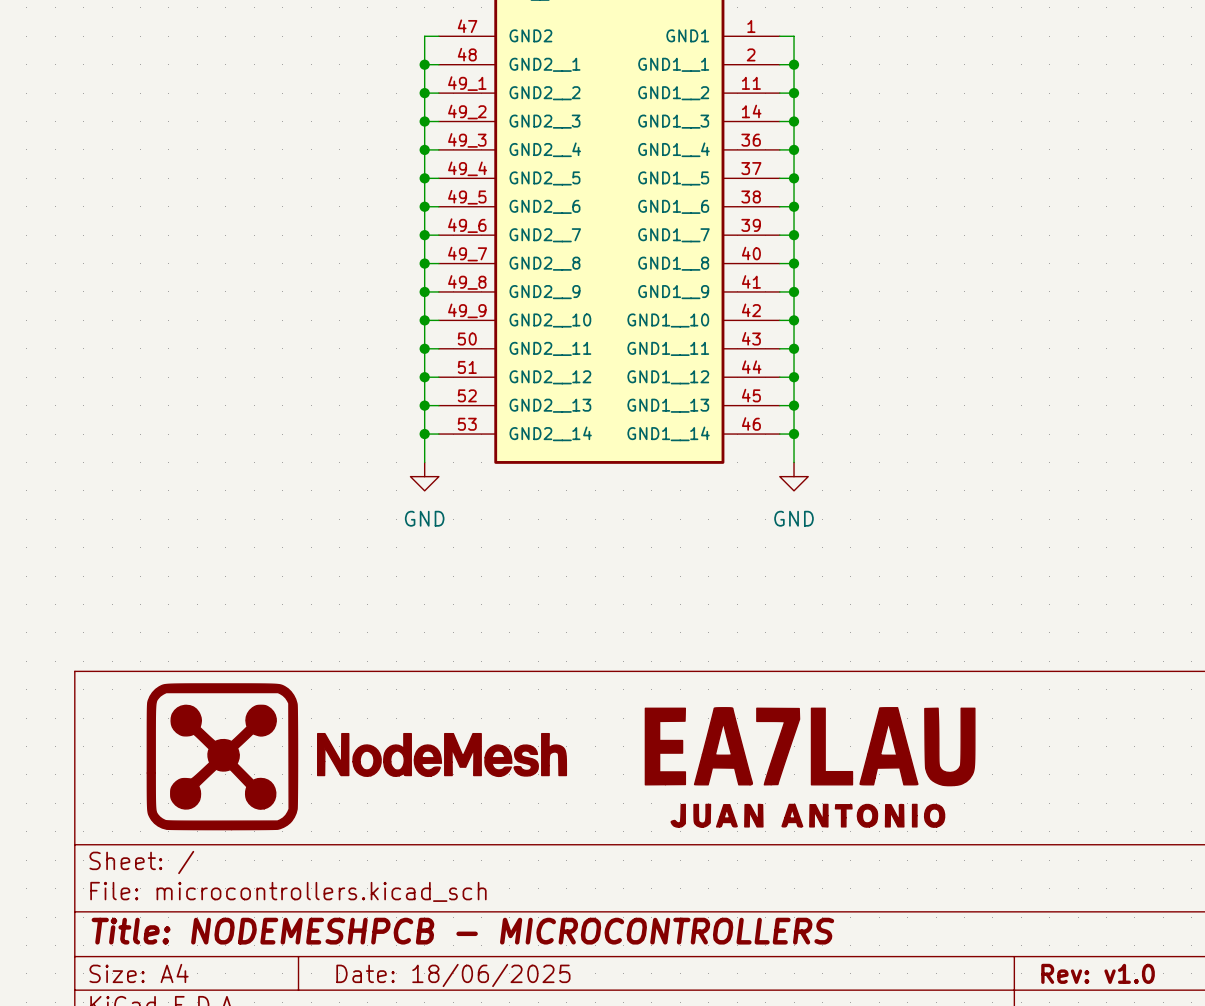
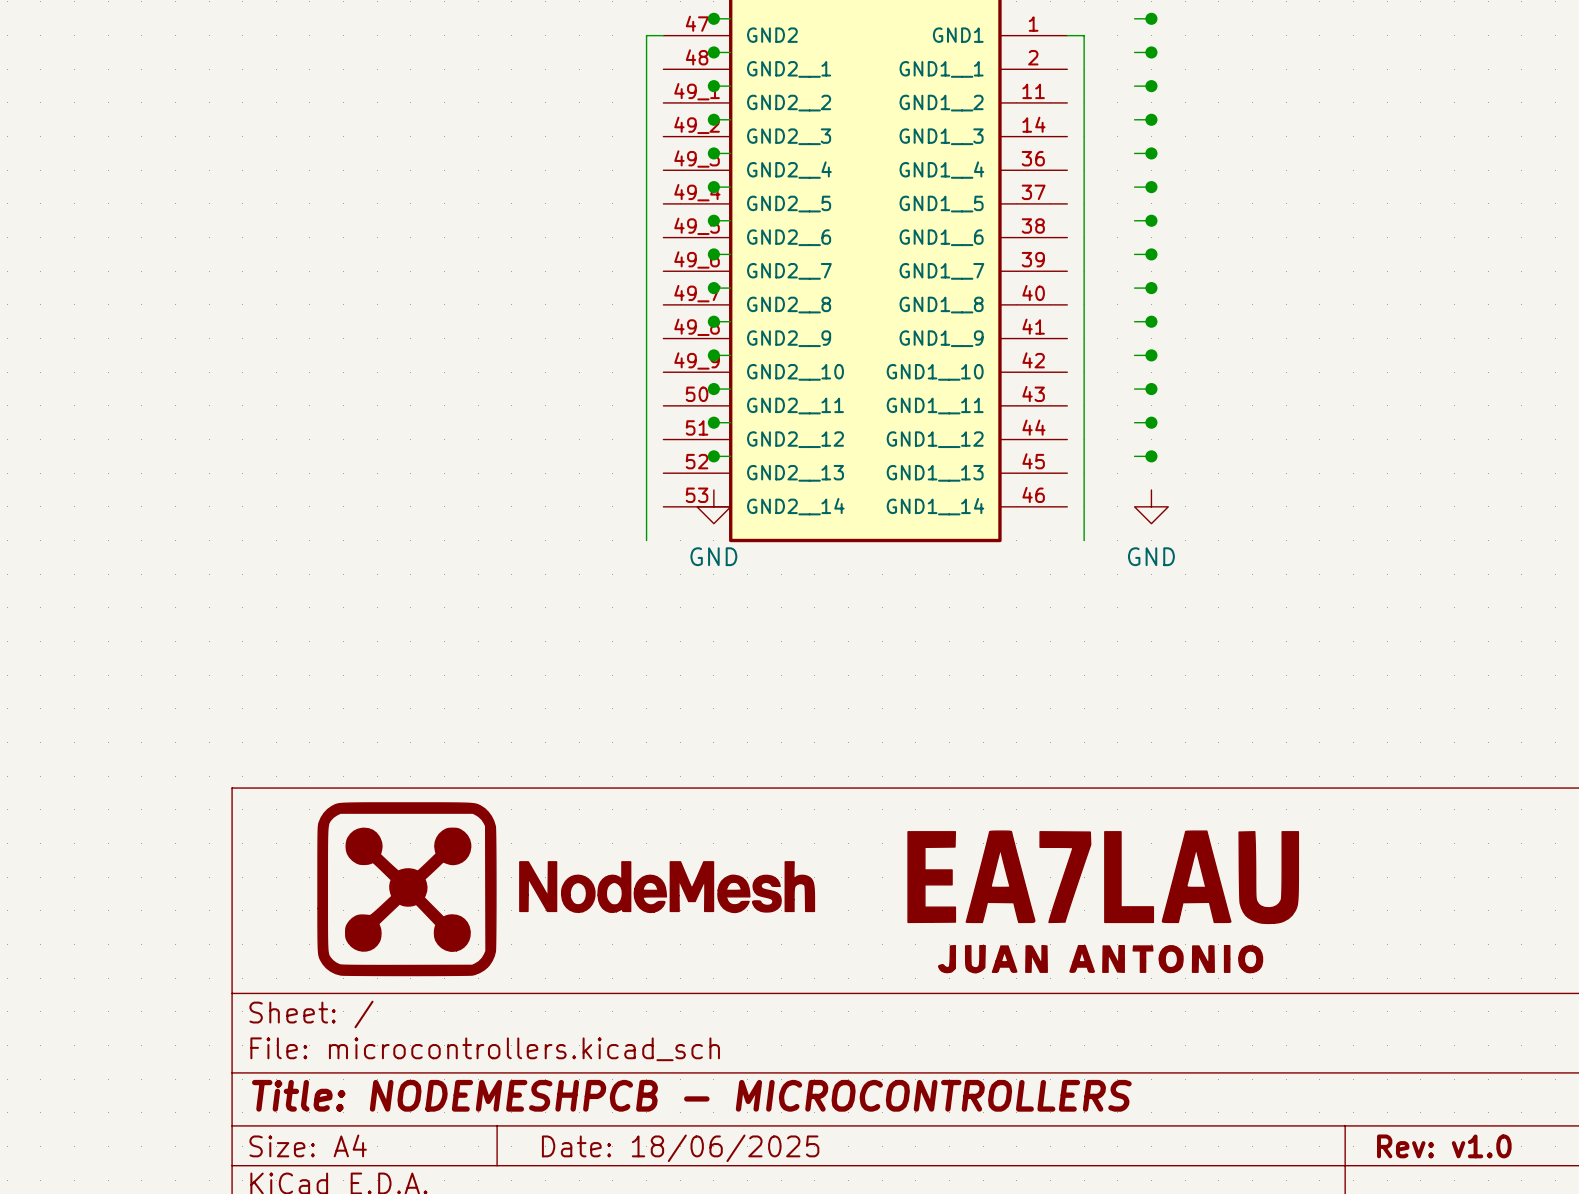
junction: none -> (713, 18)
junction: none -> (1151, 18)
junction: none -> (713, 52)
junction: none -> (1151, 52)
wire: (424, 64) (438, 64) -> (713, 18) (730, 18)
junction: (424, 64) -> none
wire: (779, 64) (794, 64) -> (1134, 18) (1151, 18)
junction: (794, 64) -> none
junction: none -> (713, 86)
junction: none -> (1151, 86)
wire: (424, 93) (438, 93) -> (713, 52) (730, 52)
junction: (424, 93) -> none
wire: (779, 93) (794, 93) -> (1134, 52) (1151, 52)
junction: (794, 93) -> none
junction: none -> (713, 119)
junction: none -> (1151, 119)
wire: (424, 121) (438, 121) -> (713, 86) (730, 86)
junction: (424, 121) -> none
wire: (779, 121) (794, 121) -> (1134, 86) (1151, 86)
junction: (794, 121) -> none
junction: none -> (713, 153)
junction: none -> (1151, 153)
wire: (424, 149) (438, 149) -> (713, 119) (730, 119)
junction: (424, 149) -> none
wire: (779, 149) (794, 149) -> (1134, 119) (1151, 119)
junction: (794, 149) -> none
junction: none -> (713, 187)
junction: none -> (1151, 187)
wire: (424, 178) (438, 178) -> (713, 153) (730, 153)
junction: (424, 178) -> none
wire: (779, 178) (794, 178) -> (1134, 153) (1151, 153)
junction: (794, 178) -> none
junction: none -> (713, 220)
junction: none -> (1151, 220)
wire: (424, 206) (438, 206) -> (713, 187) (730, 187)
junction: (424, 206) -> none
wire: (779, 206) (794, 206) -> (1134, 187) (1151, 187)
junction: (794, 206) -> none
junction: none -> (713, 254)
junction: none -> (1151, 254)
wire: (424, 235) (438, 235) -> (713, 220) (730, 220)
junction: (424, 235) -> none
wire: (779, 235) (794, 235) -> (1134, 220) (1151, 220)
junction: (794, 235) -> none
junction: none -> (713, 288)
junction: none -> (1151, 288)
wire: (424, 263) (438, 263) -> (713, 254) (730, 254)
junction: (424, 263) -> none
wire: (779, 263) (794, 263) -> (1134, 254) (1151, 254)
junction: (794, 263) -> none
junction: none -> (713, 321)
junction: none -> (1151, 321)
wire: (424, 291) (438, 291) -> (713, 288) (730, 288)
junction: (424, 291) -> none
wire: (779, 291) (794, 291) -> (1134, 288) (1151, 288)
junction: (794, 291) -> none
junction: none -> (713, 355)
junction: none -> (1151, 355)
wire: (424, 320) (438, 320) -> (713, 321) (730, 321)
junction: (424, 320) -> none
wire: (779, 320) (794, 320) -> (1134, 321) (1151, 321)
junction: (794, 320) -> none
junction: none -> (713, 389)
junction: none -> (1151, 389)
wire: (424, 348) (438, 348) -> (713, 355) (730, 355)
junction: (424, 348) -> none
wire: (779, 348) (794, 348) -> (1134, 355) (1151, 355)
junction: (794, 348) -> none
junction: none -> (713, 422)
junction: none -> (1151, 422)
wire: (424, 377) (438, 377) -> (713, 389) (730, 389)
junction: (424, 377) -> none
wire: (779, 377) (794, 377) -> (1134, 389) (1151, 389)
junction: (794, 377) -> none
junction: none -> (713, 456)
junction: none -> (1151, 456)
wire: (424, 405) (438, 405) -> (713, 422) (730, 422)
junction: (424, 405) -> none
wire: (779, 405) (794, 405) -> (1134, 422) (1151, 422)
junction: (794, 405) -> none
wire: (424, 434) (438, 434) -> (713, 456) (730, 456)
junction: (424, 434) -> none
wire: (779, 434) (794, 434) -> (1134, 456) (1151, 456)
junction: (794, 434) -> none
power symbol position: GND (424, 476) -> GND (713, 506)
power symbol position: GND (794, 476) -> GND (1151, 506)

